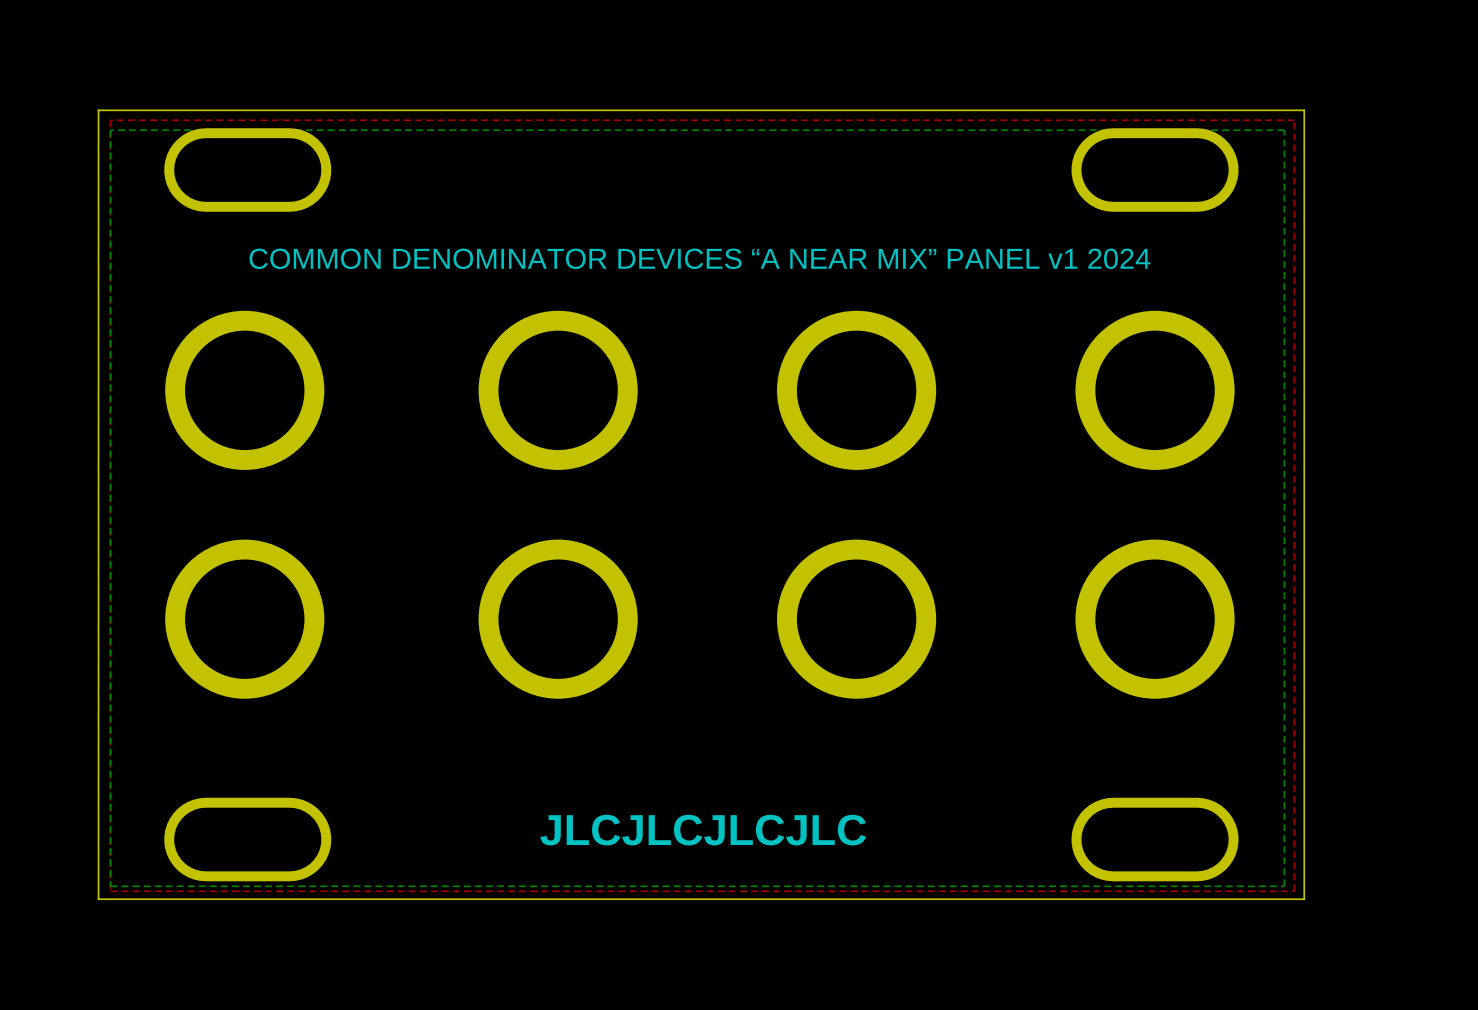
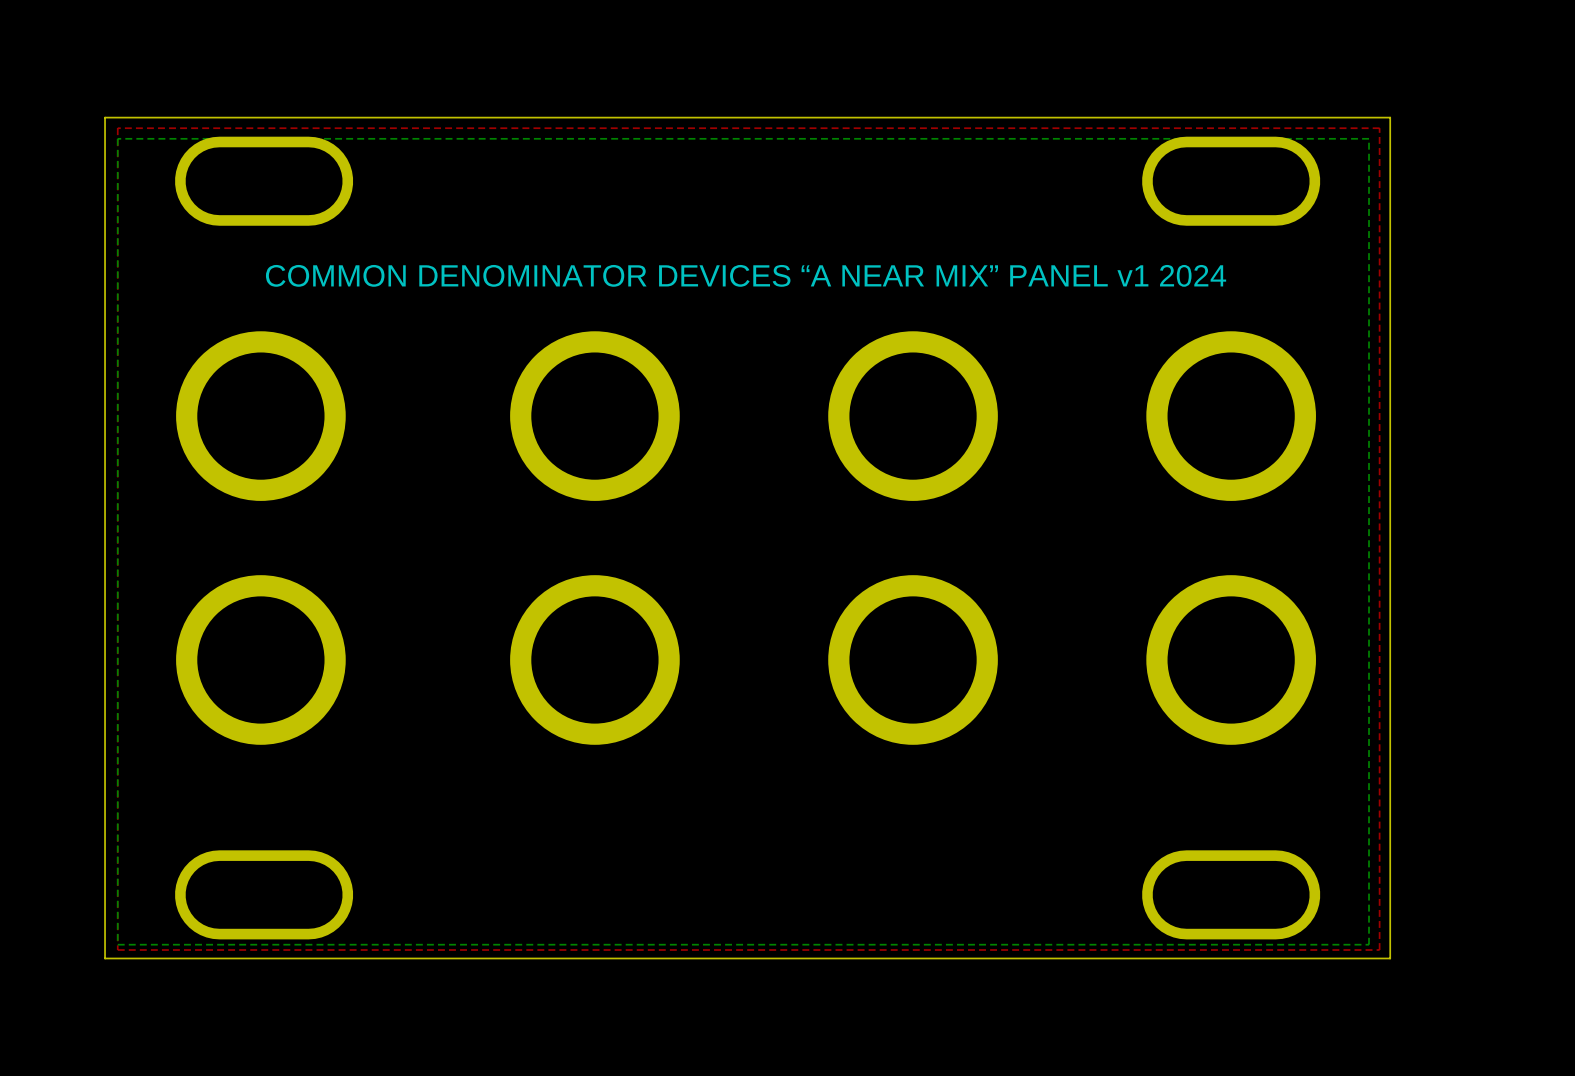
text: JLCJLCJLCJLC (703, 830) -> none

